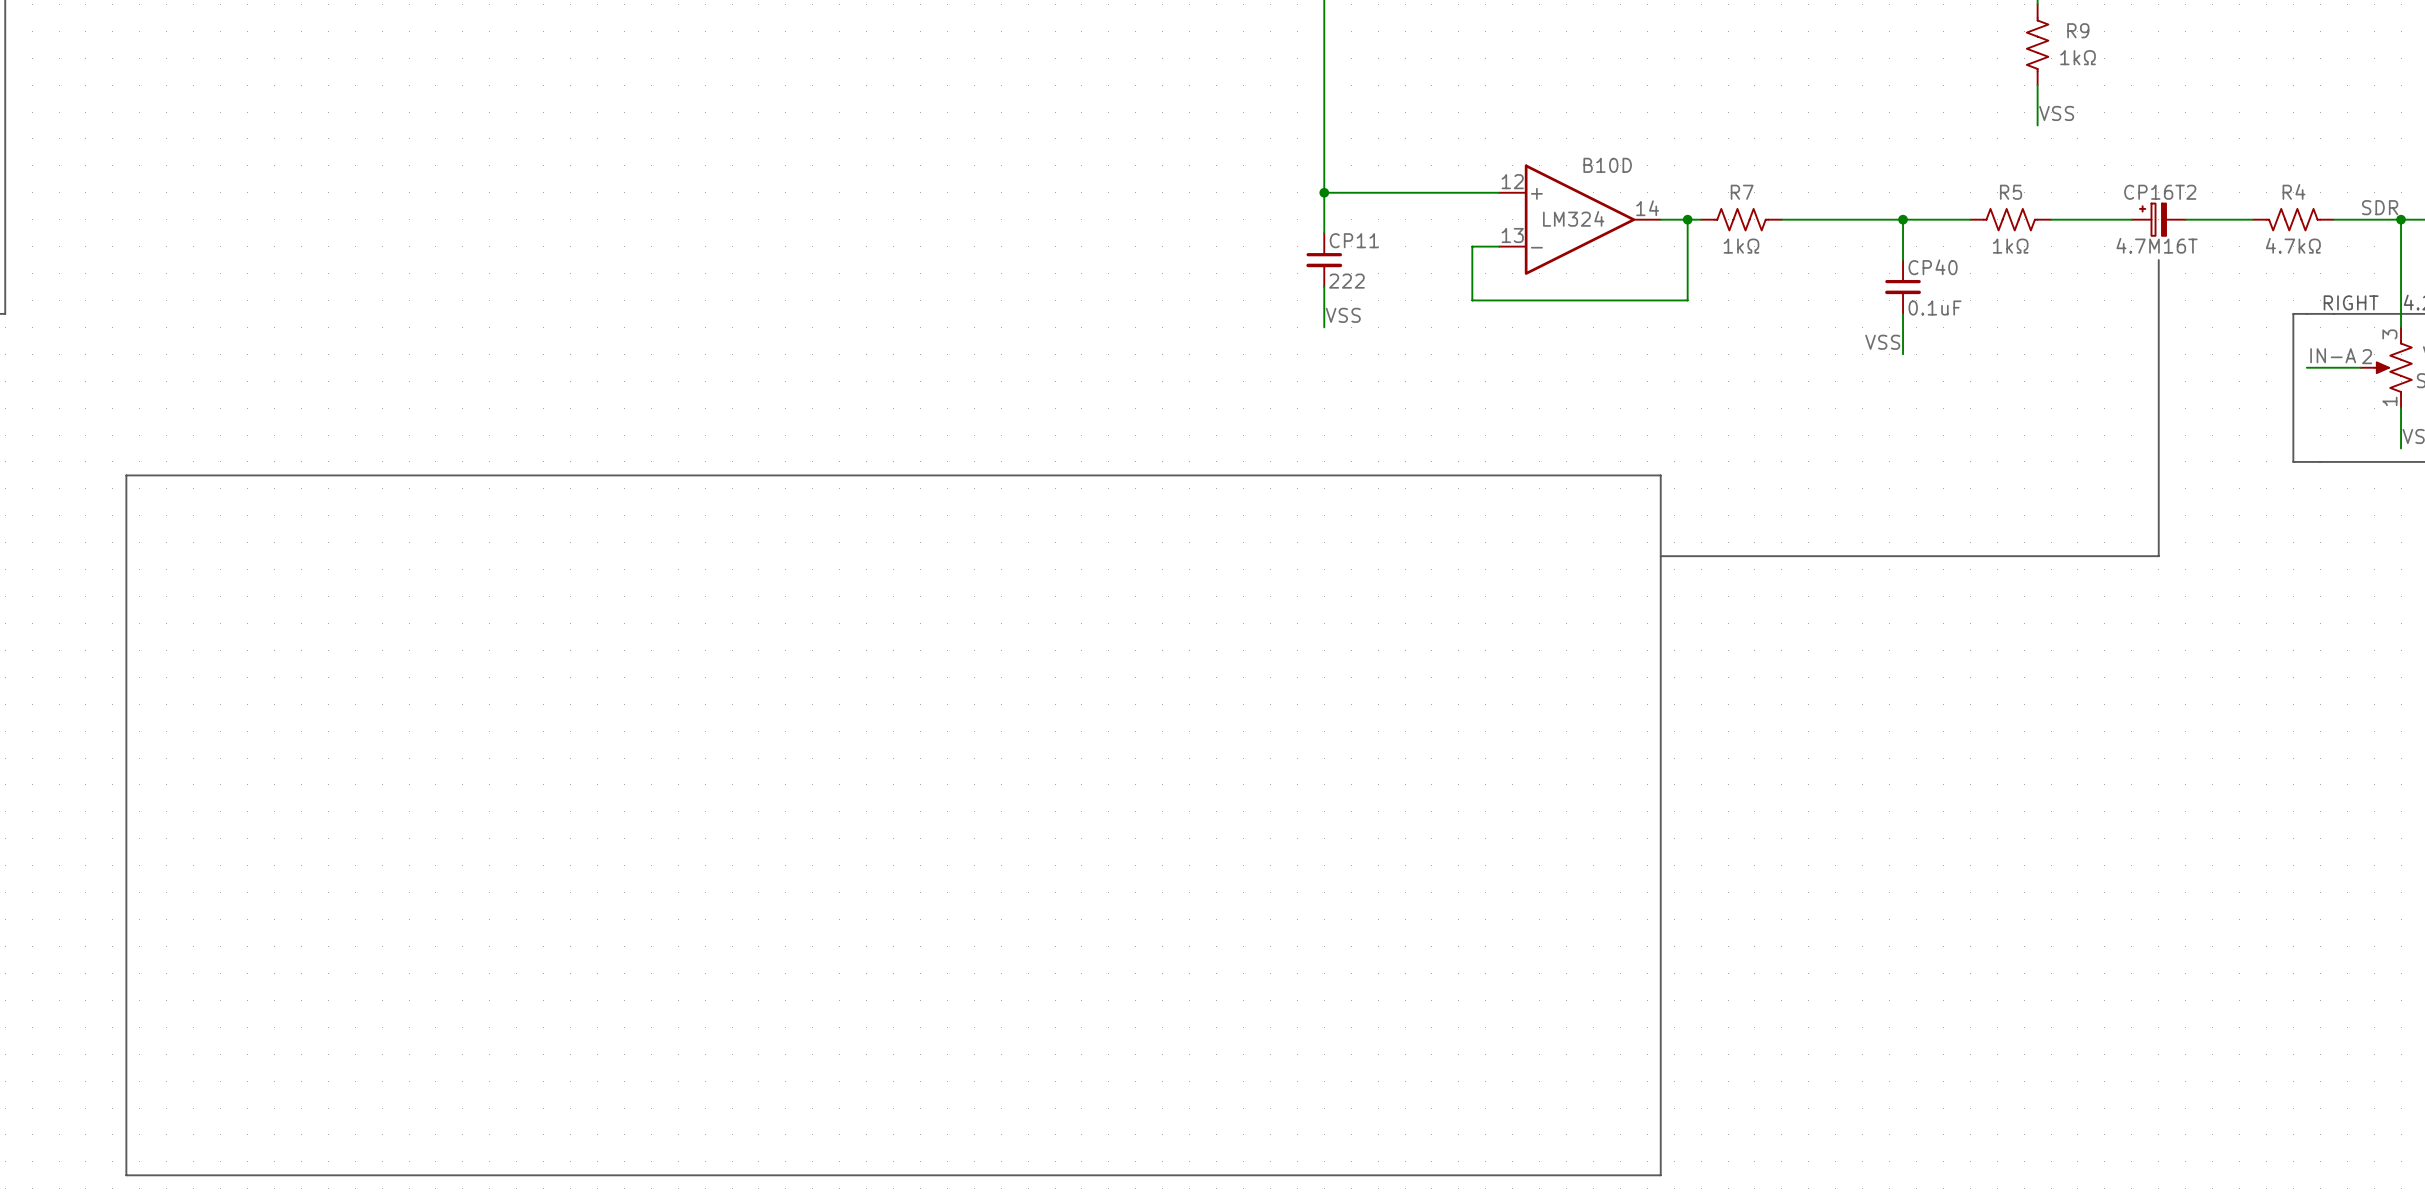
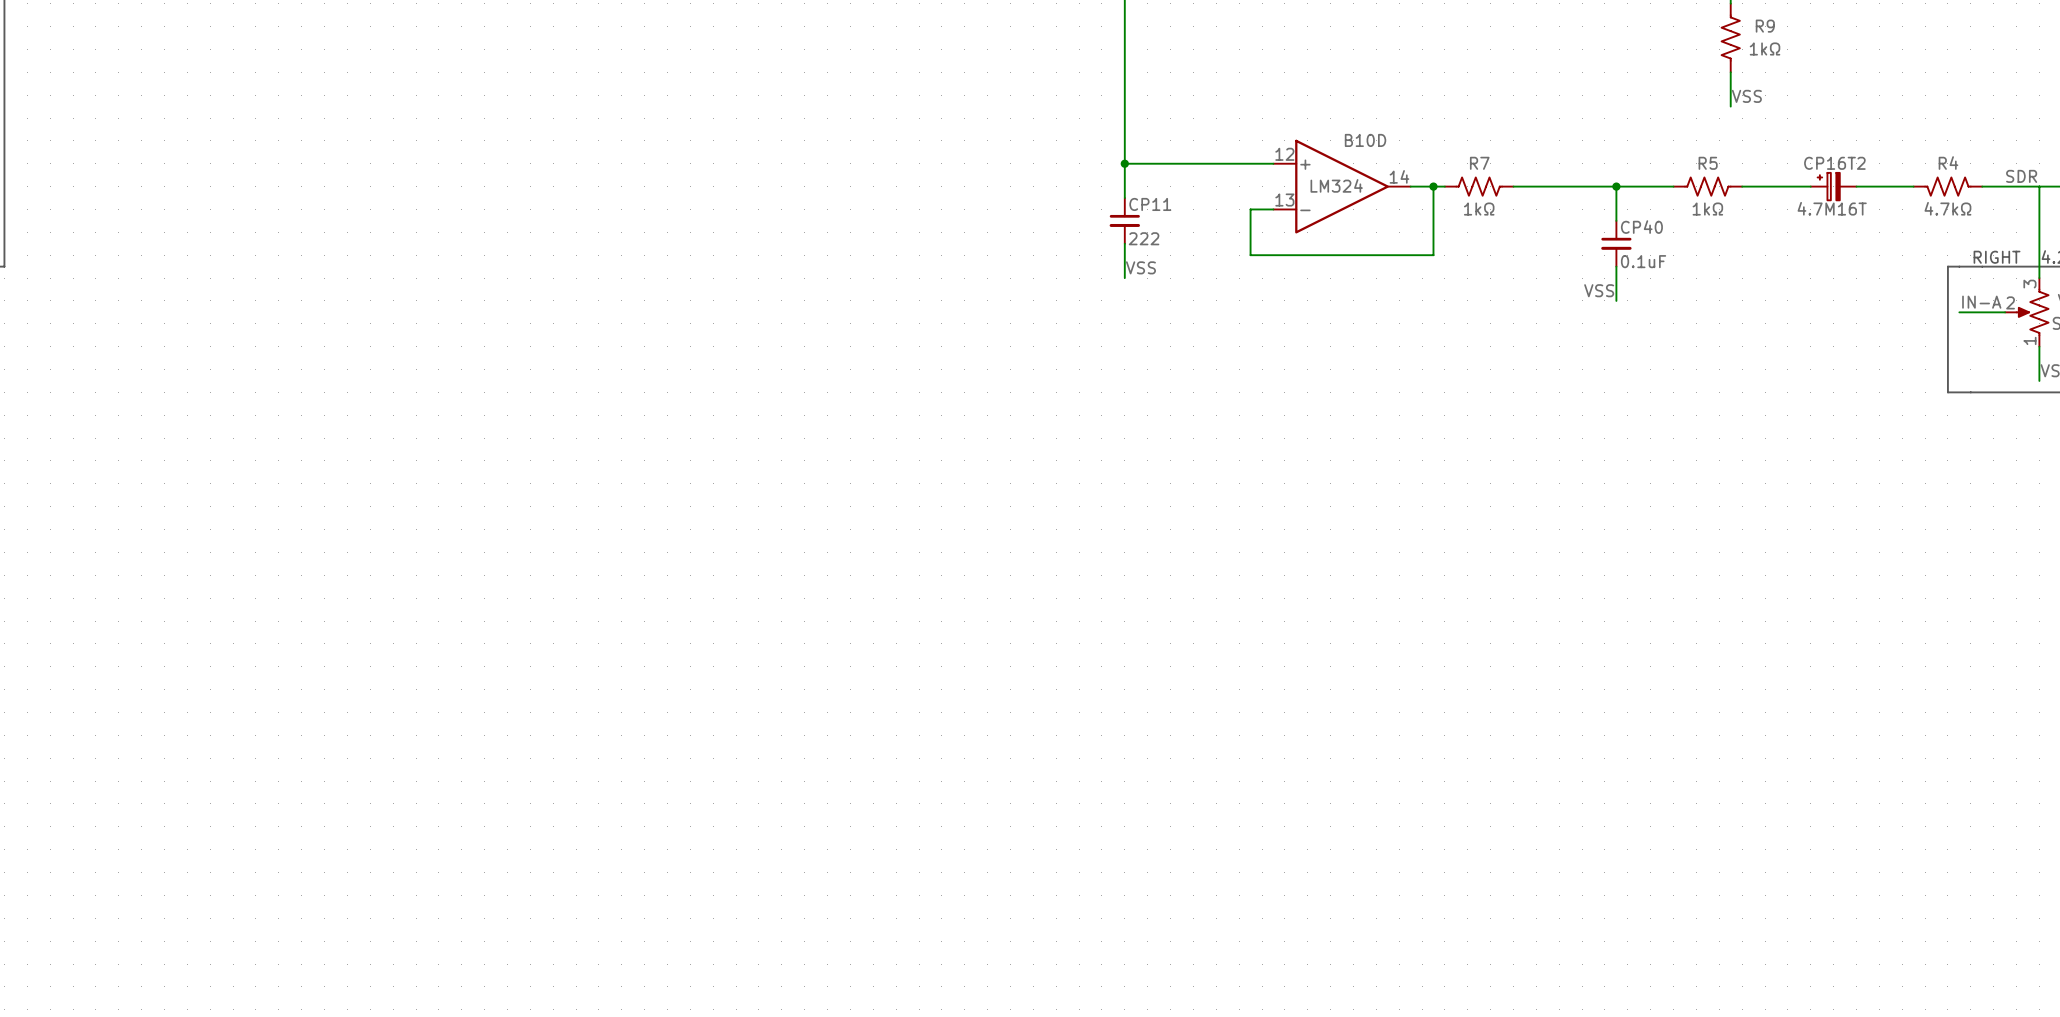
junction: (2401, 219) -> none
line: (2158, 260) (2158, 556) (1660, 556) -> none
line: (126, 475) (1660, 475) (1660, 1175) (126, 1175) (126, 475) -> none

